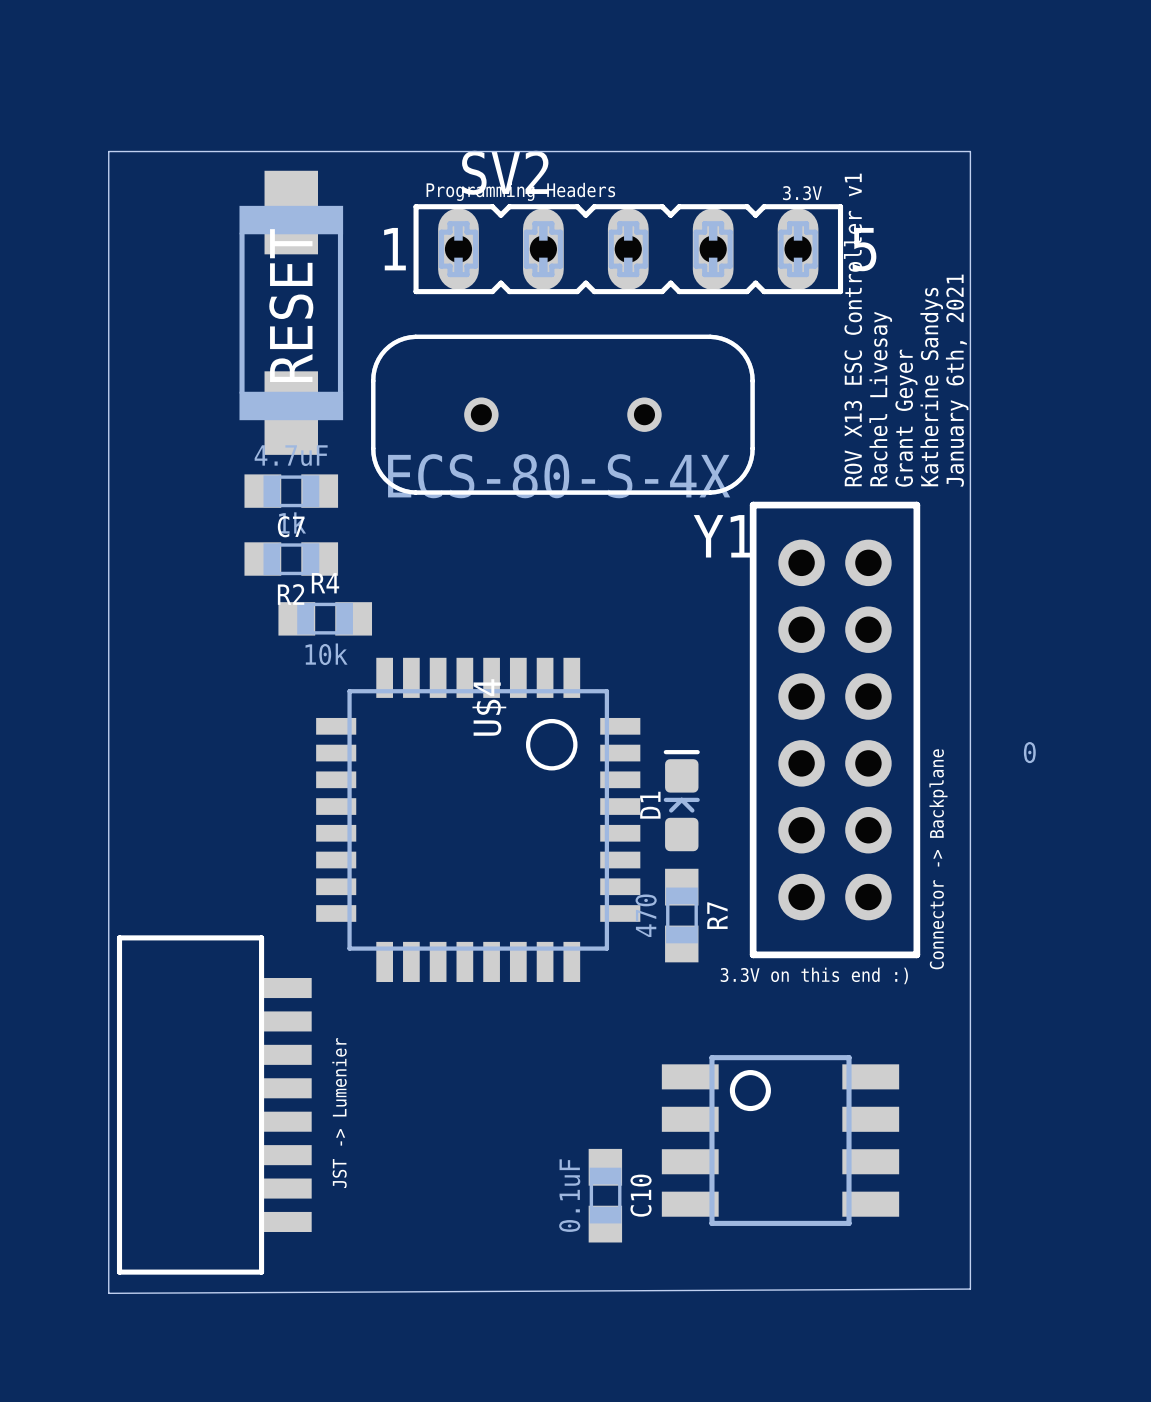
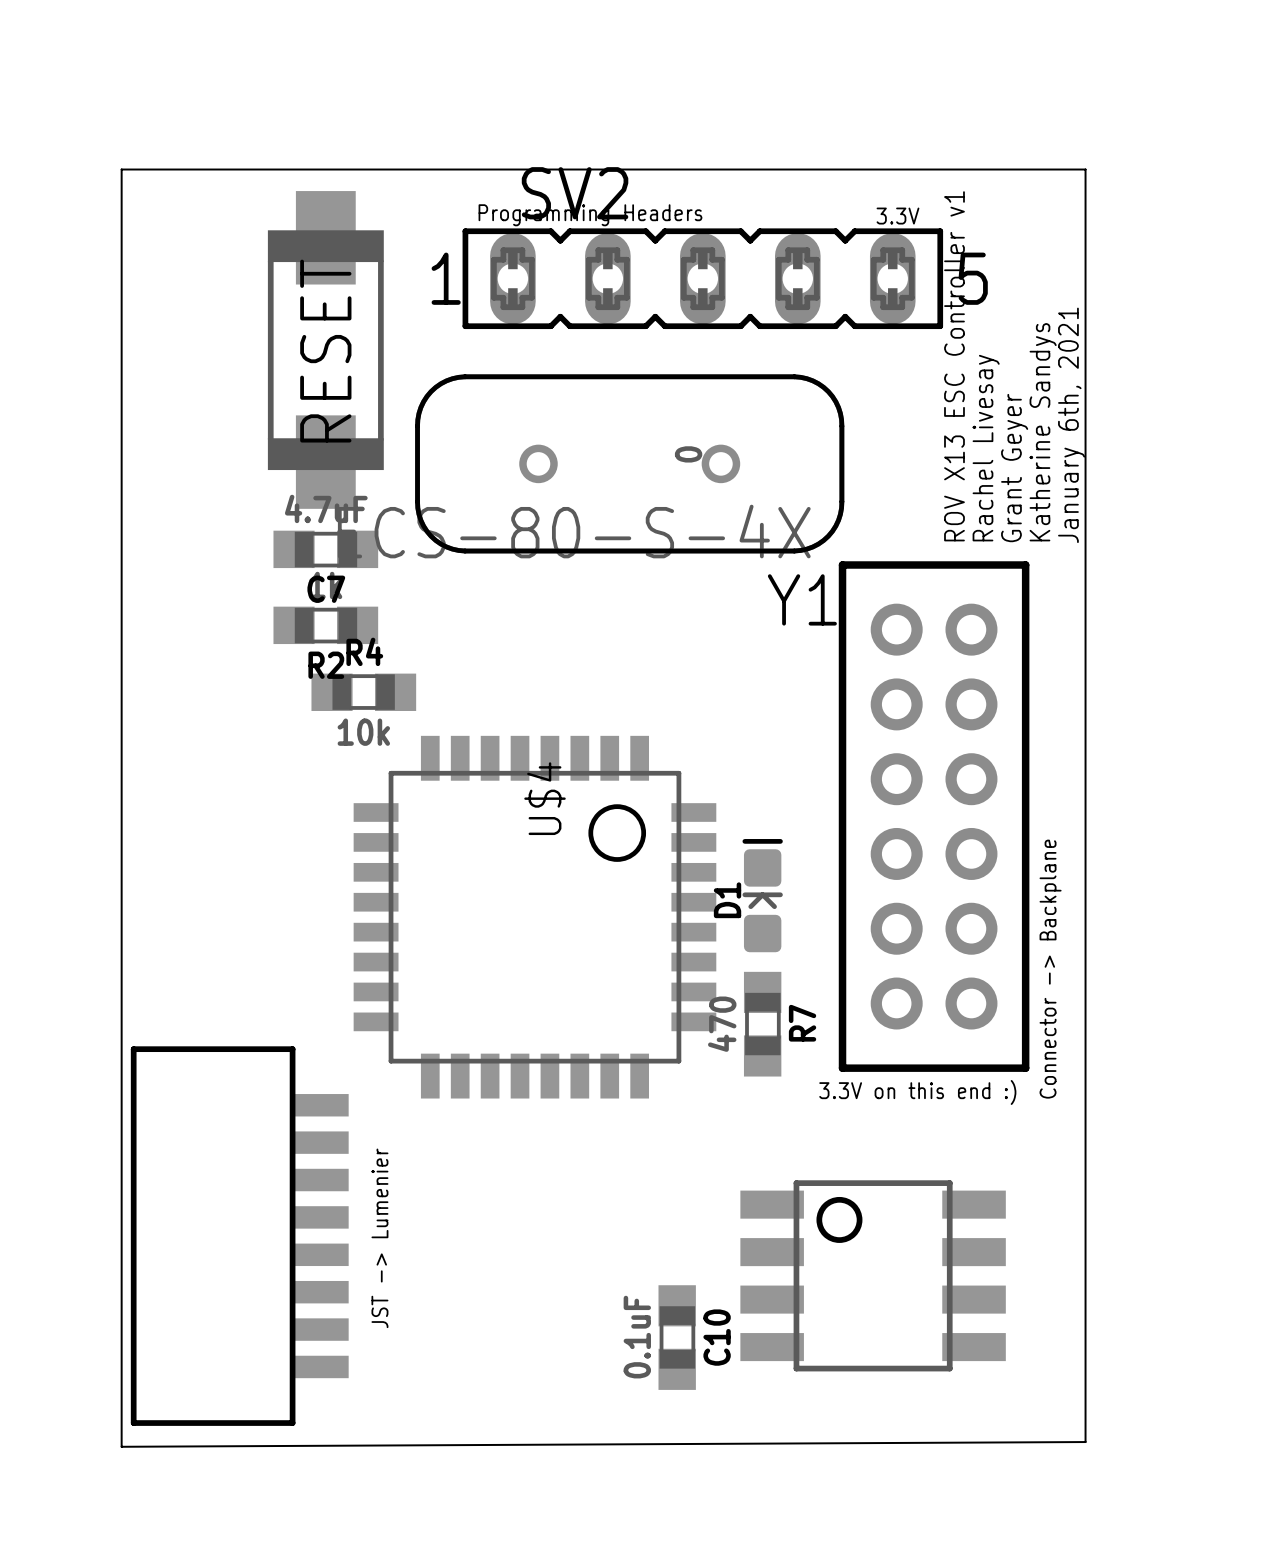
part position: (1029, 752) -> (688, 454)
part value rotation: 0° (1029, 752) -> 90° counterclockwise (688, 454)

